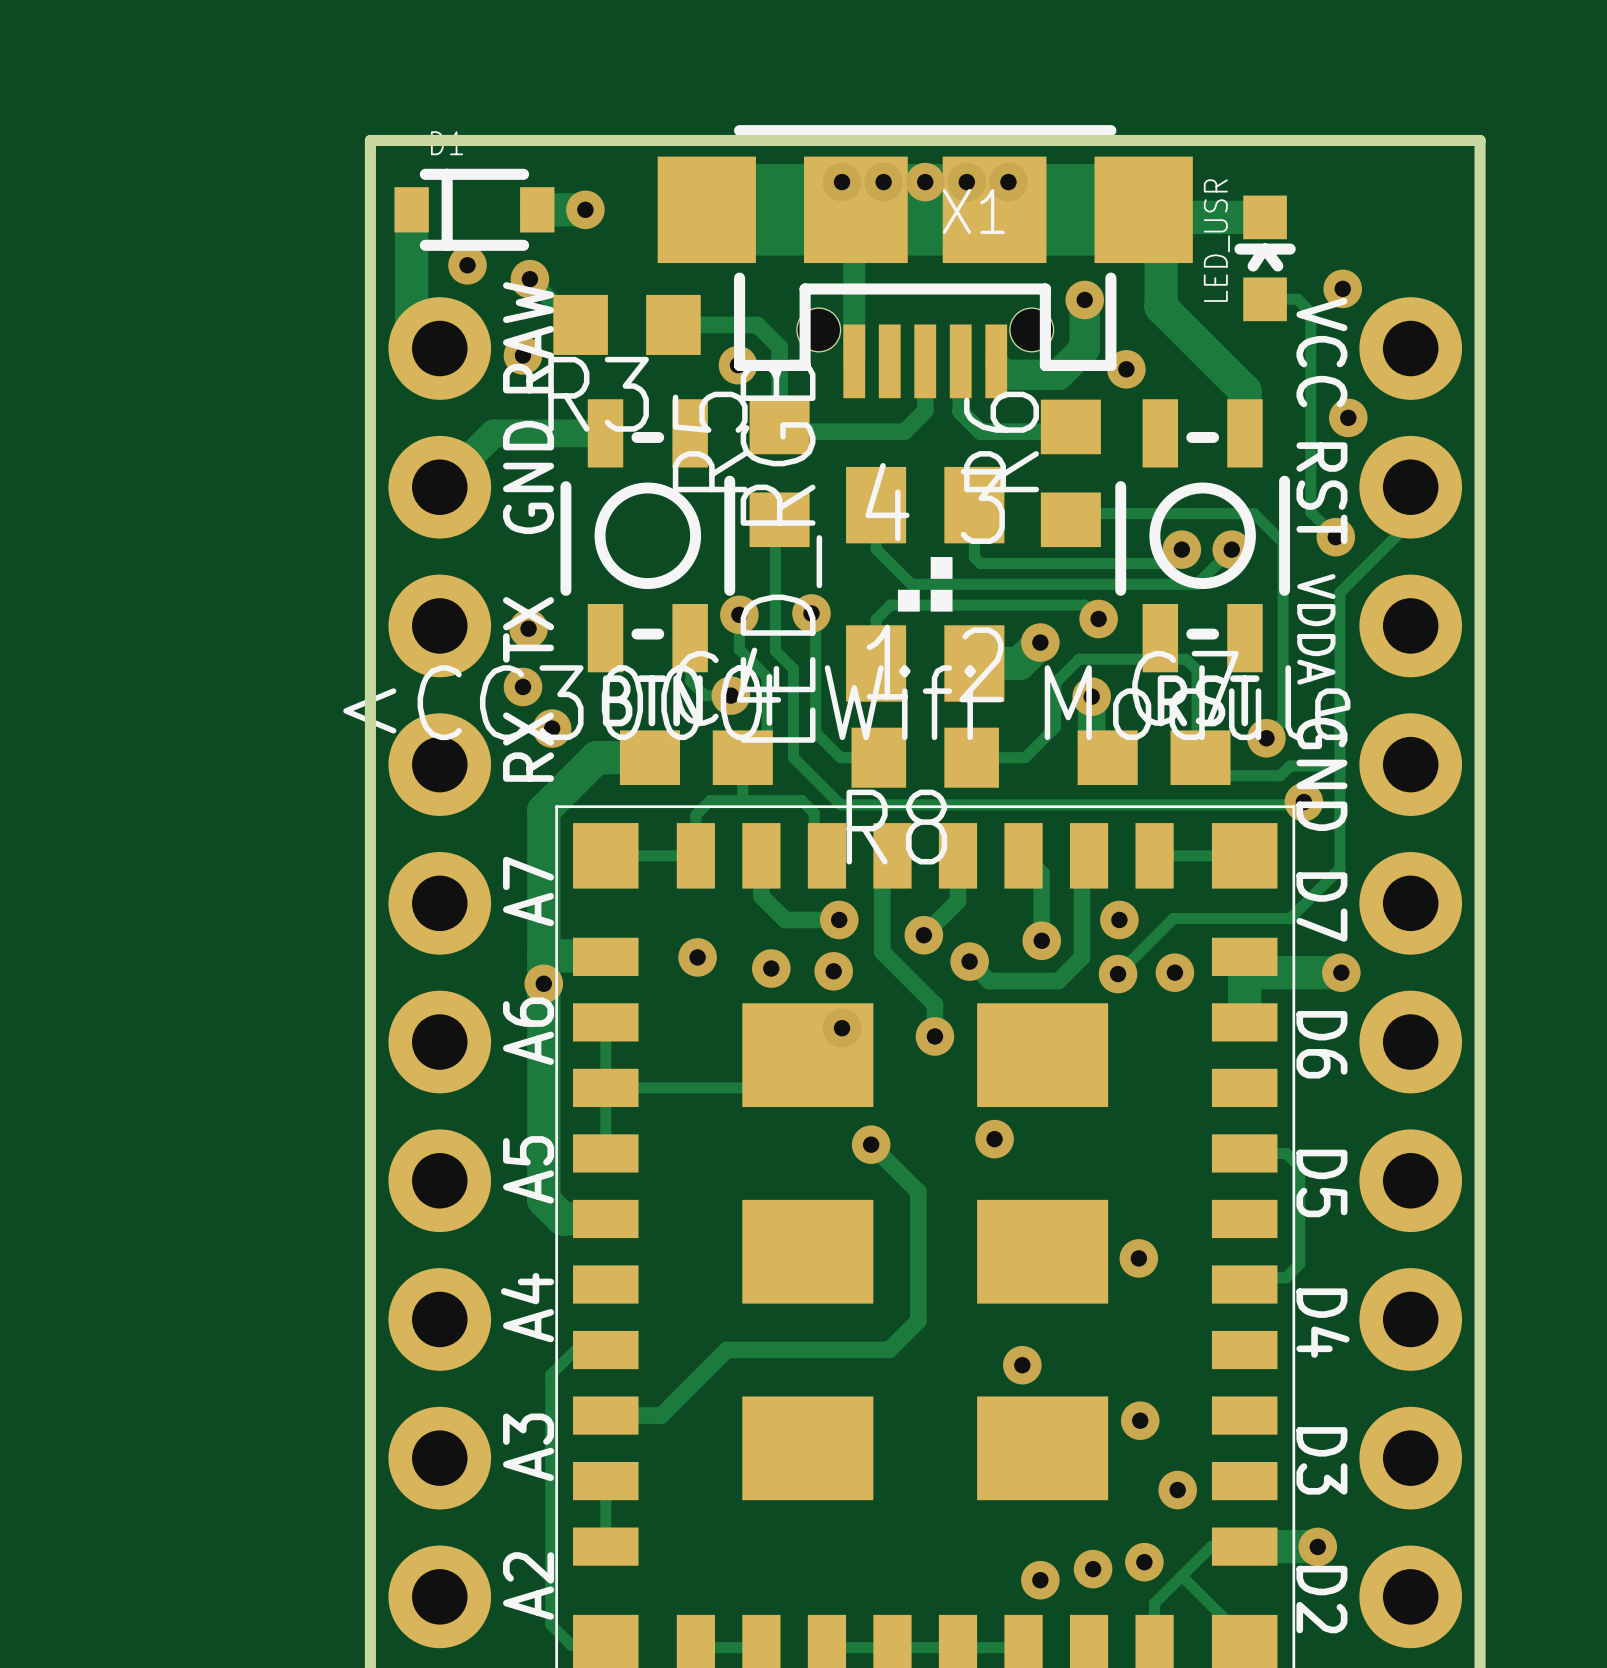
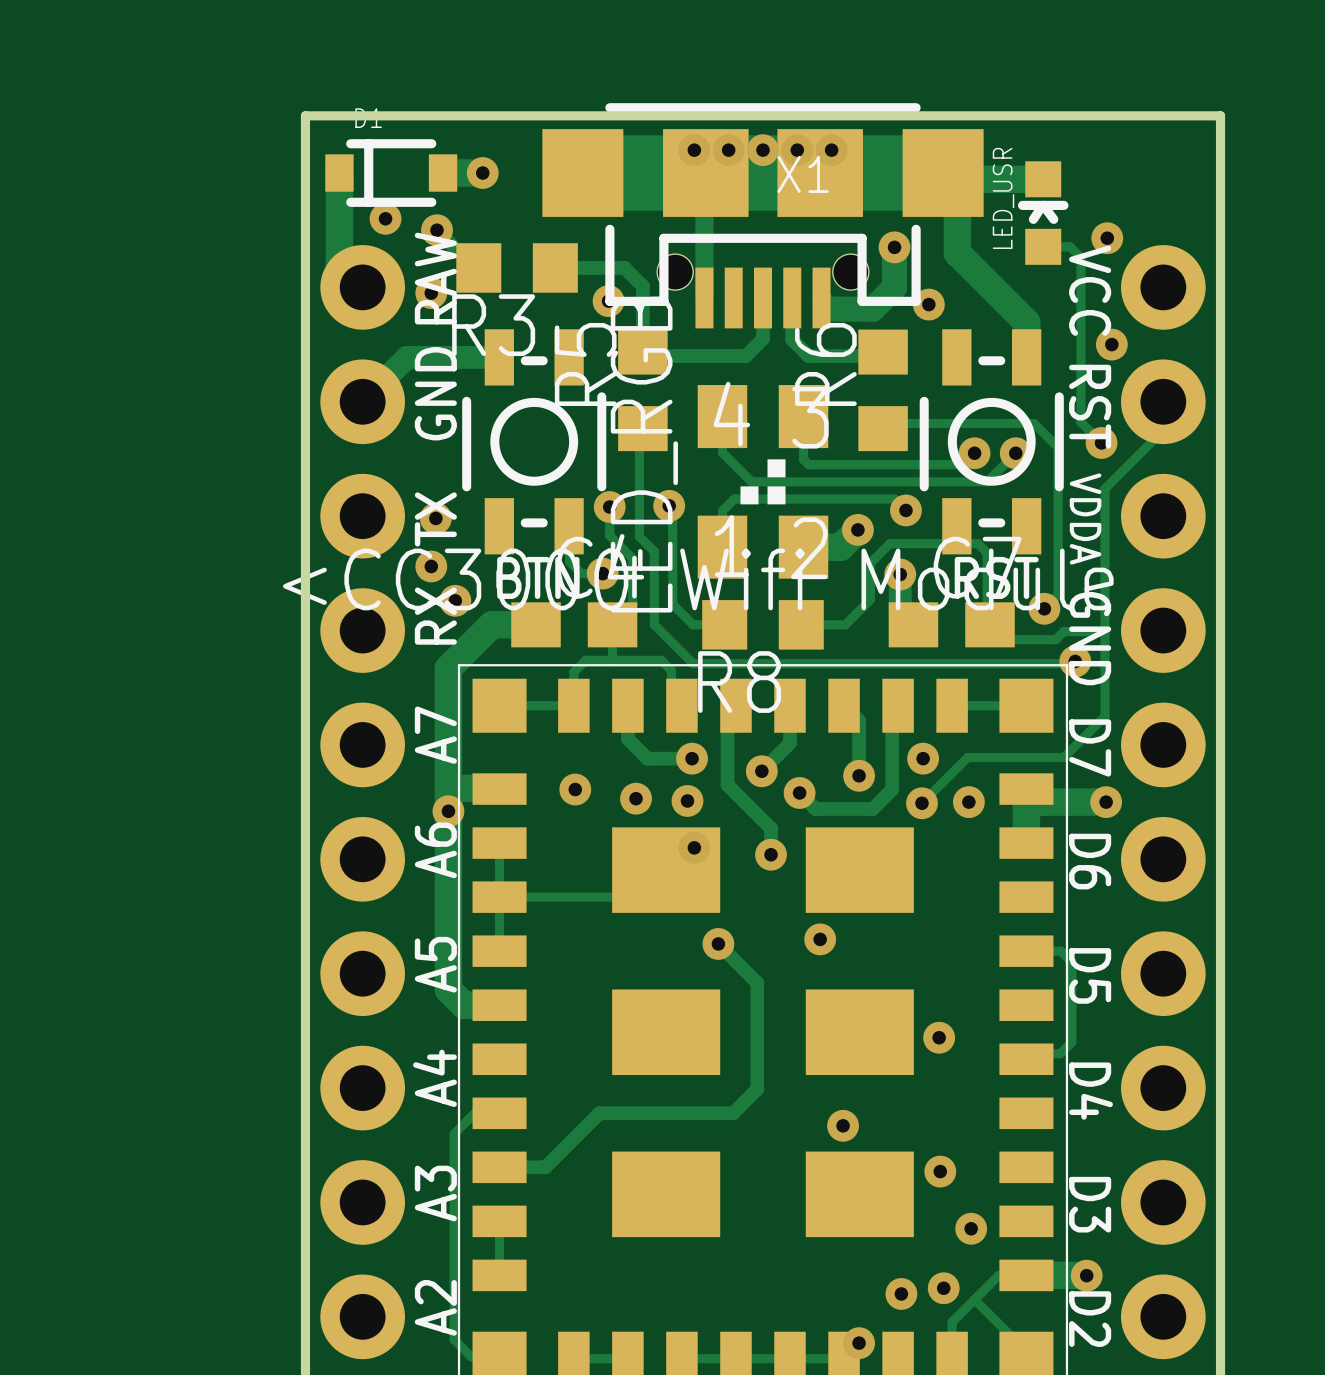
via position: (1040, 1580) -> (859, 1343)

